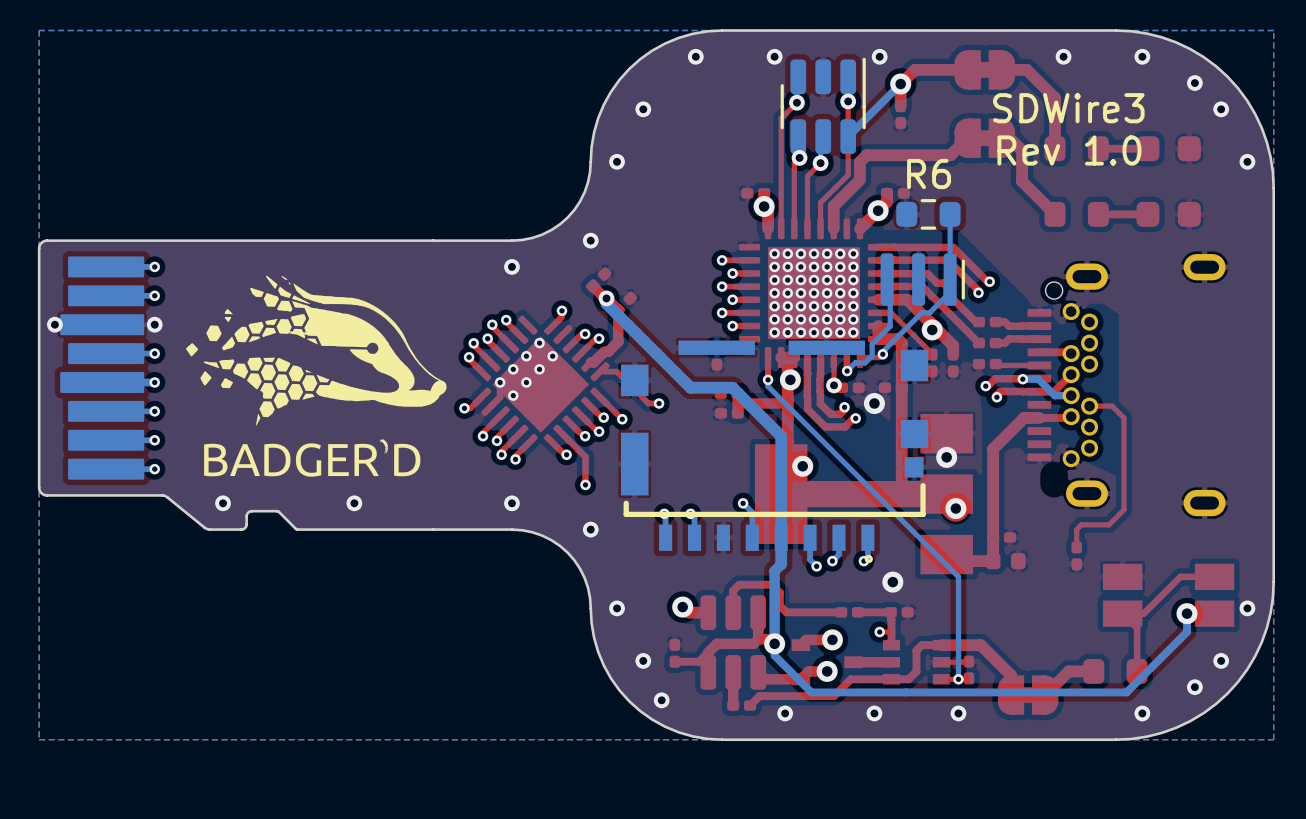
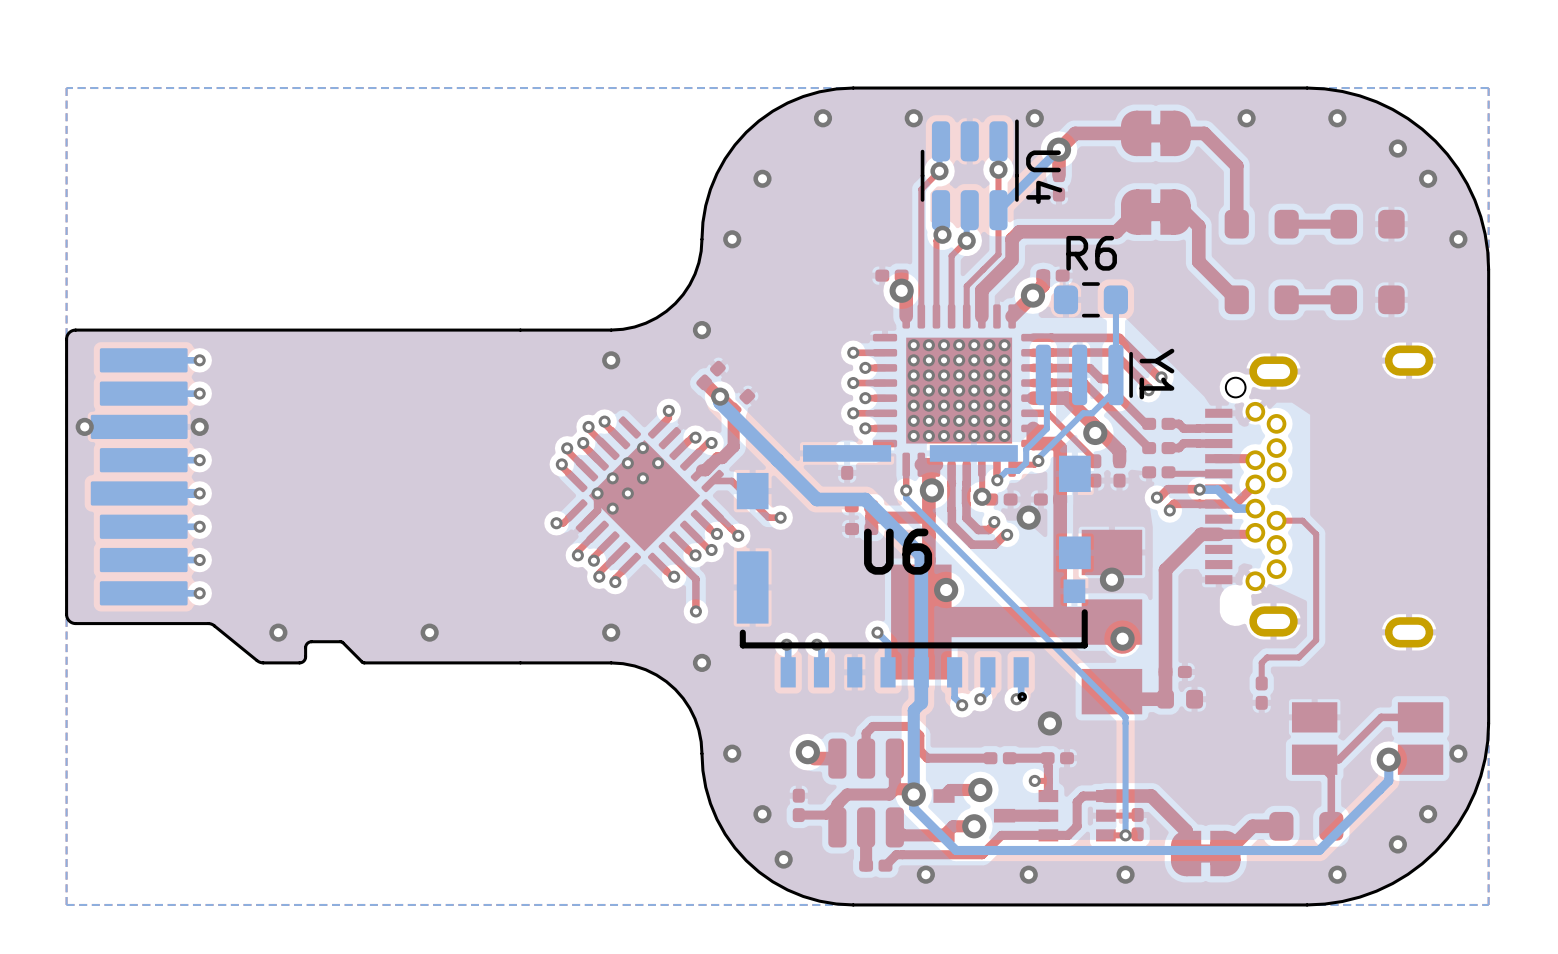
U4 name: none -> U4 (1044, 177)
text: SDWire3 (1068, 108) -> none
text: Rev 1.0 (1069, 150) -> none
drawing: [186, 275, 447, 477] -> none
Y1 name: none -> Y1 (1156, 374)
U6 name: none -> U6 (898, 551)

